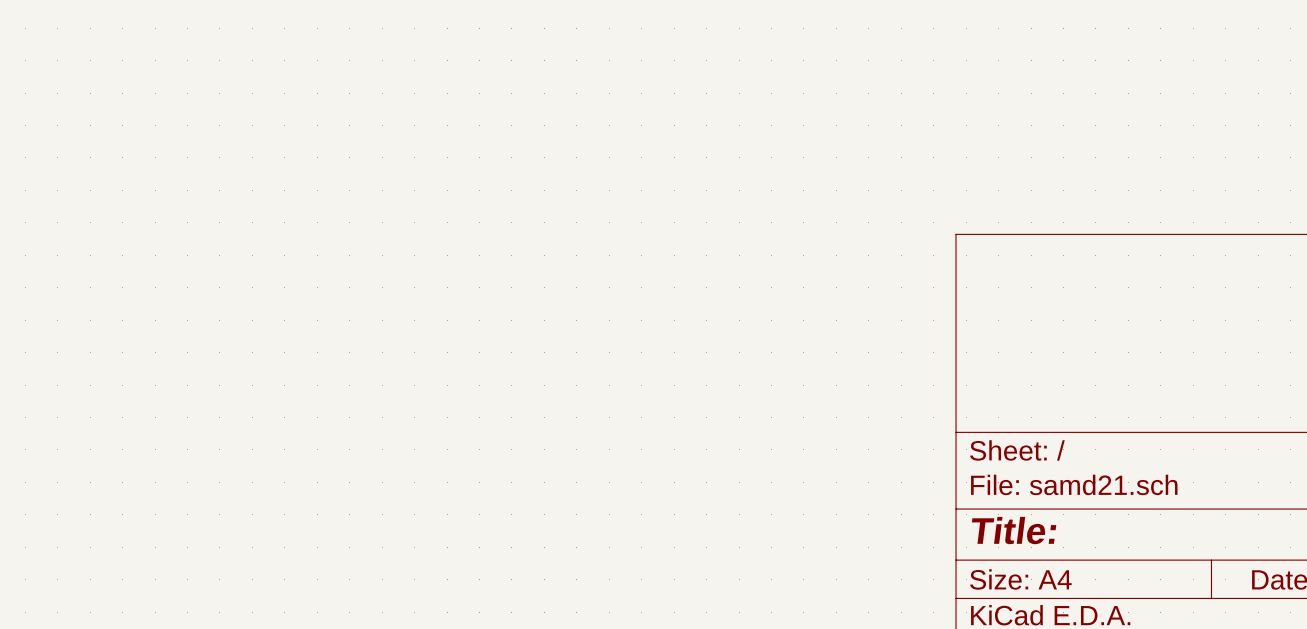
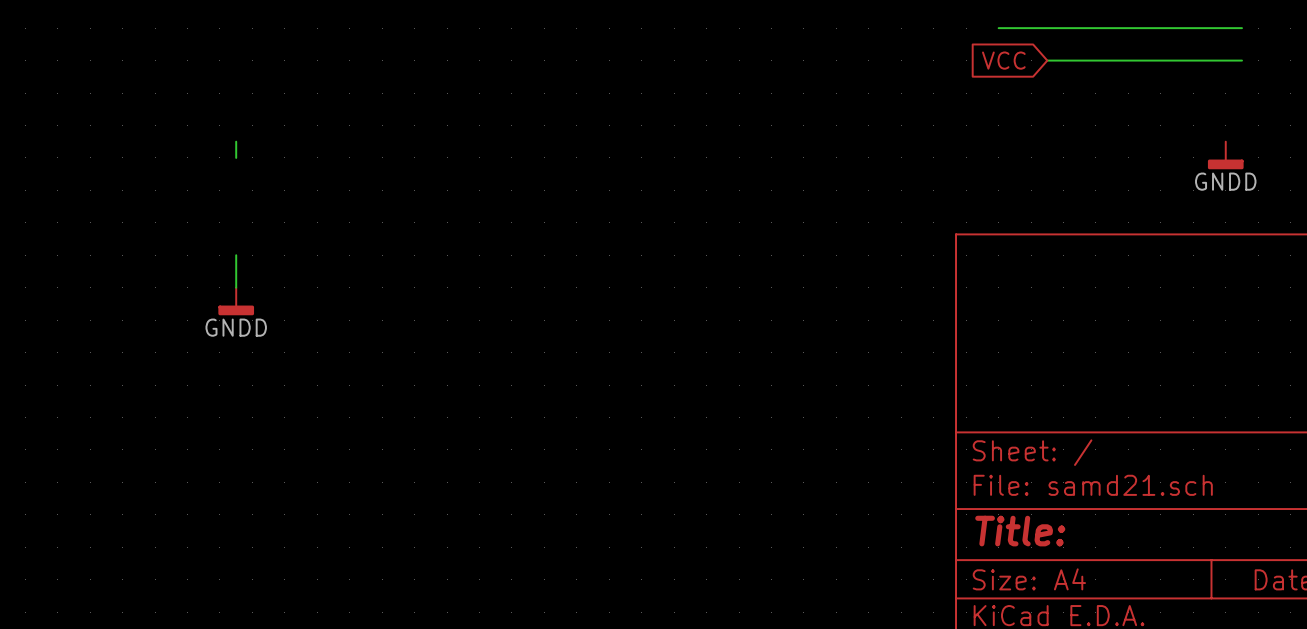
wire: none -> (998, 28) (1241, 28)
global label: none -> VCC (1003, 60)
wire: none -> (1047, 60) (1241, 60)
wire: none -> (236, 141) (236, 157)
power symbol: none -> GNDD (1225, 155)
wire: none -> (236, 255) (236, 287)
power symbol: none -> GNDD (236, 301)

